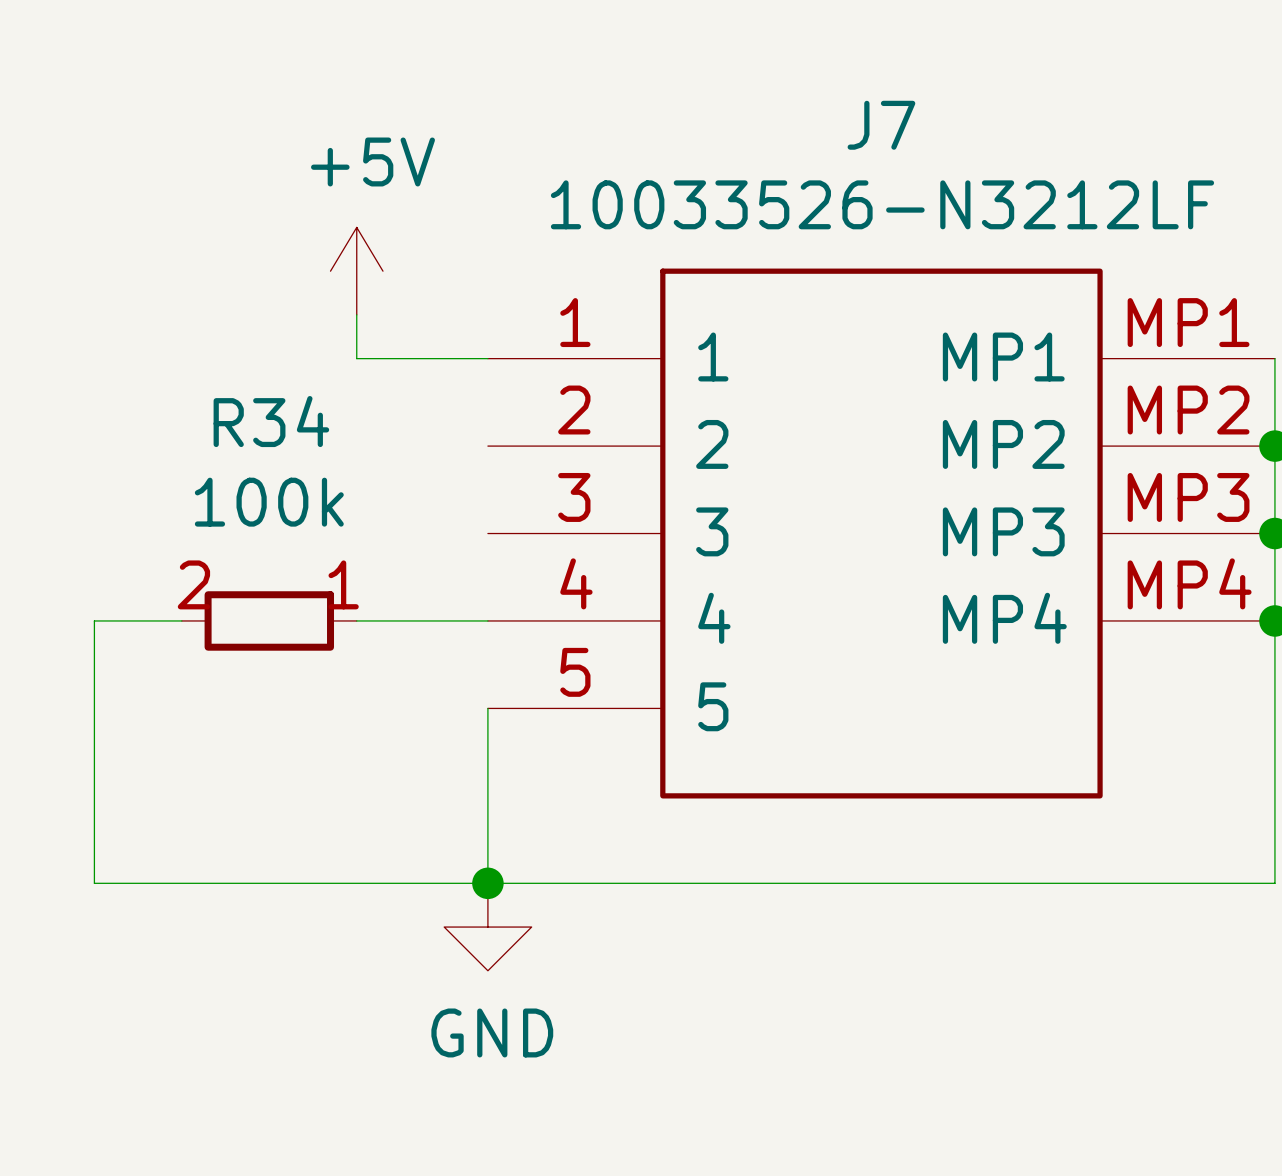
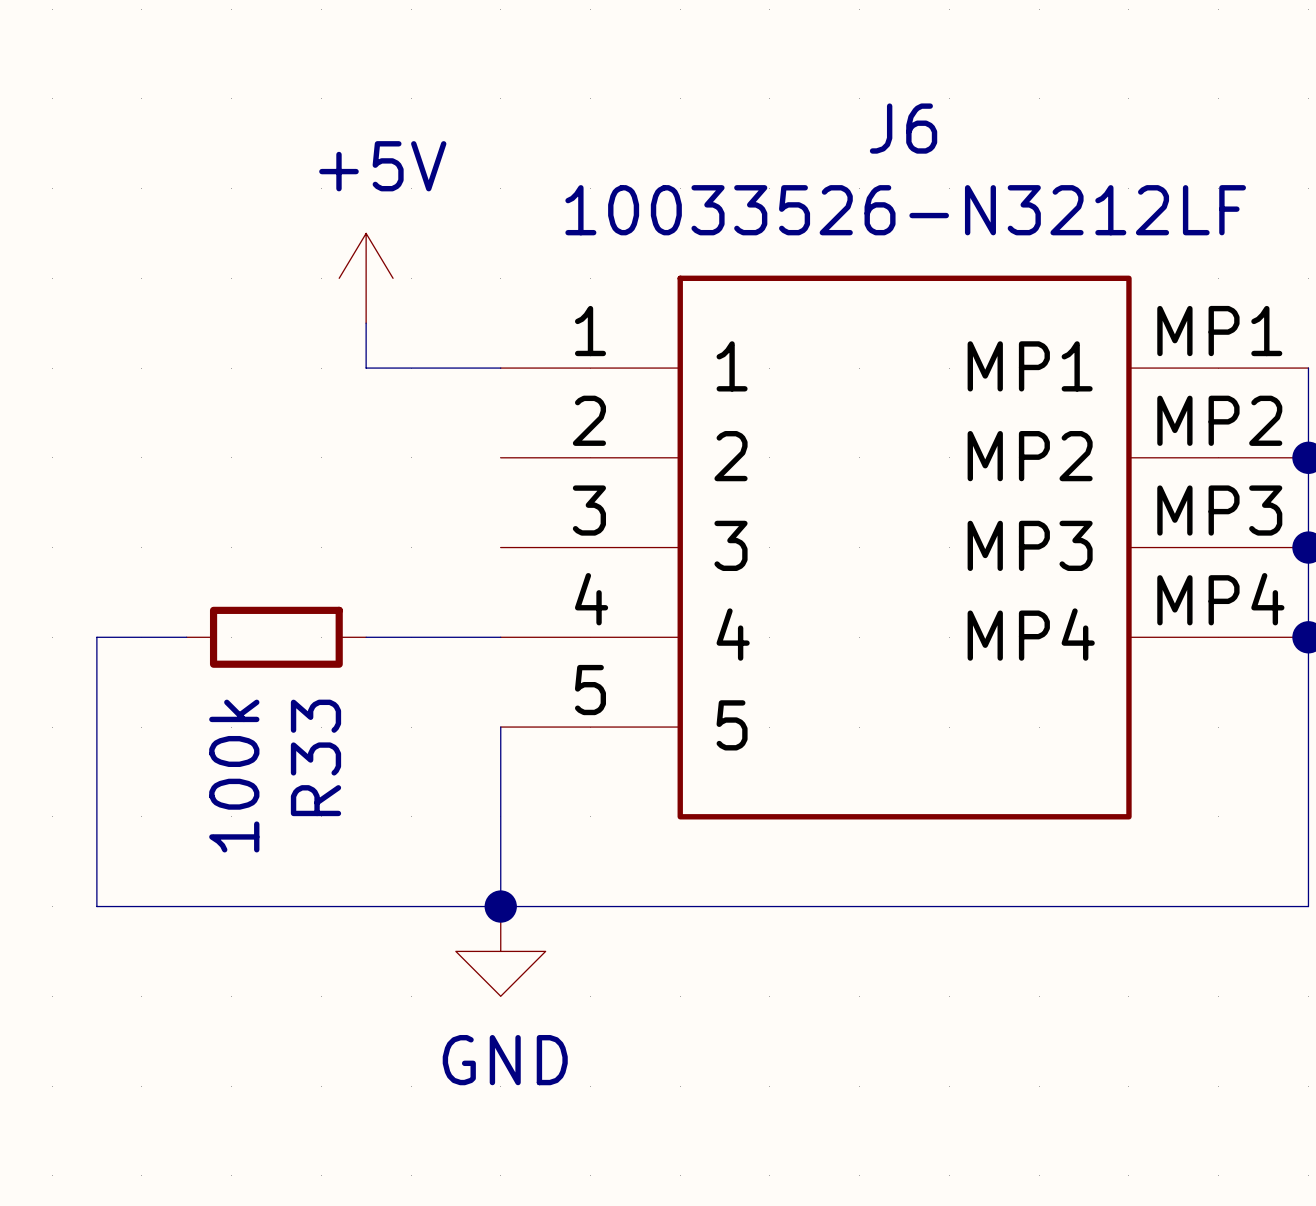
J7 name: J7 (881, 125) -> J6 (903, 128)
R34 name: R34 (271, 421) -> R33 (315, 757)
R34 value rotation: 0° (269, 502) -> 90° counterclockwise (234, 776)
R34 value position: 100k (269, 502) -> 100k (234, 776)
R34 pin number: 2 (193, 584) -> none
R34 pin number: 1 (343, 584) -> none

